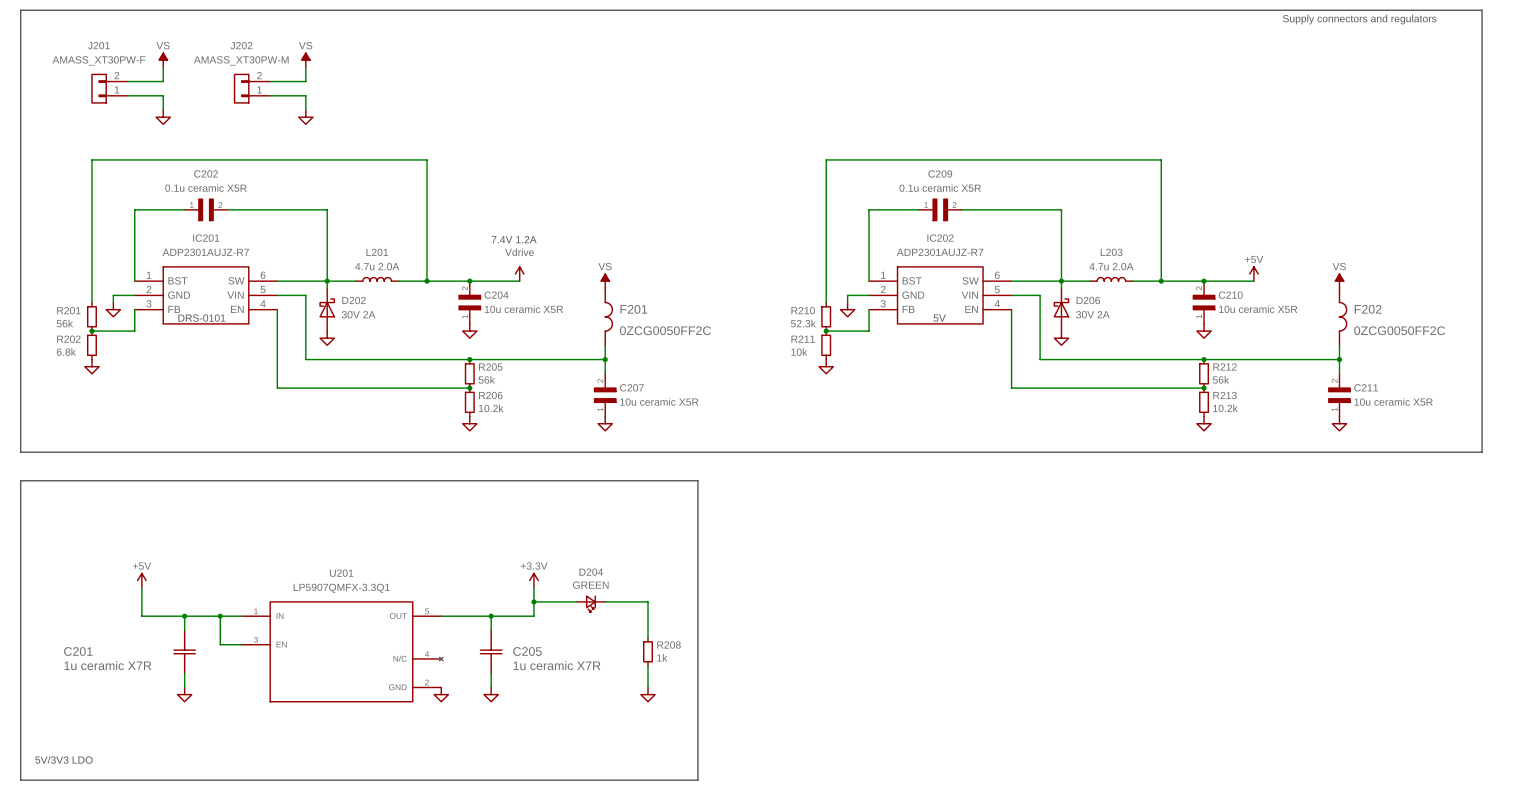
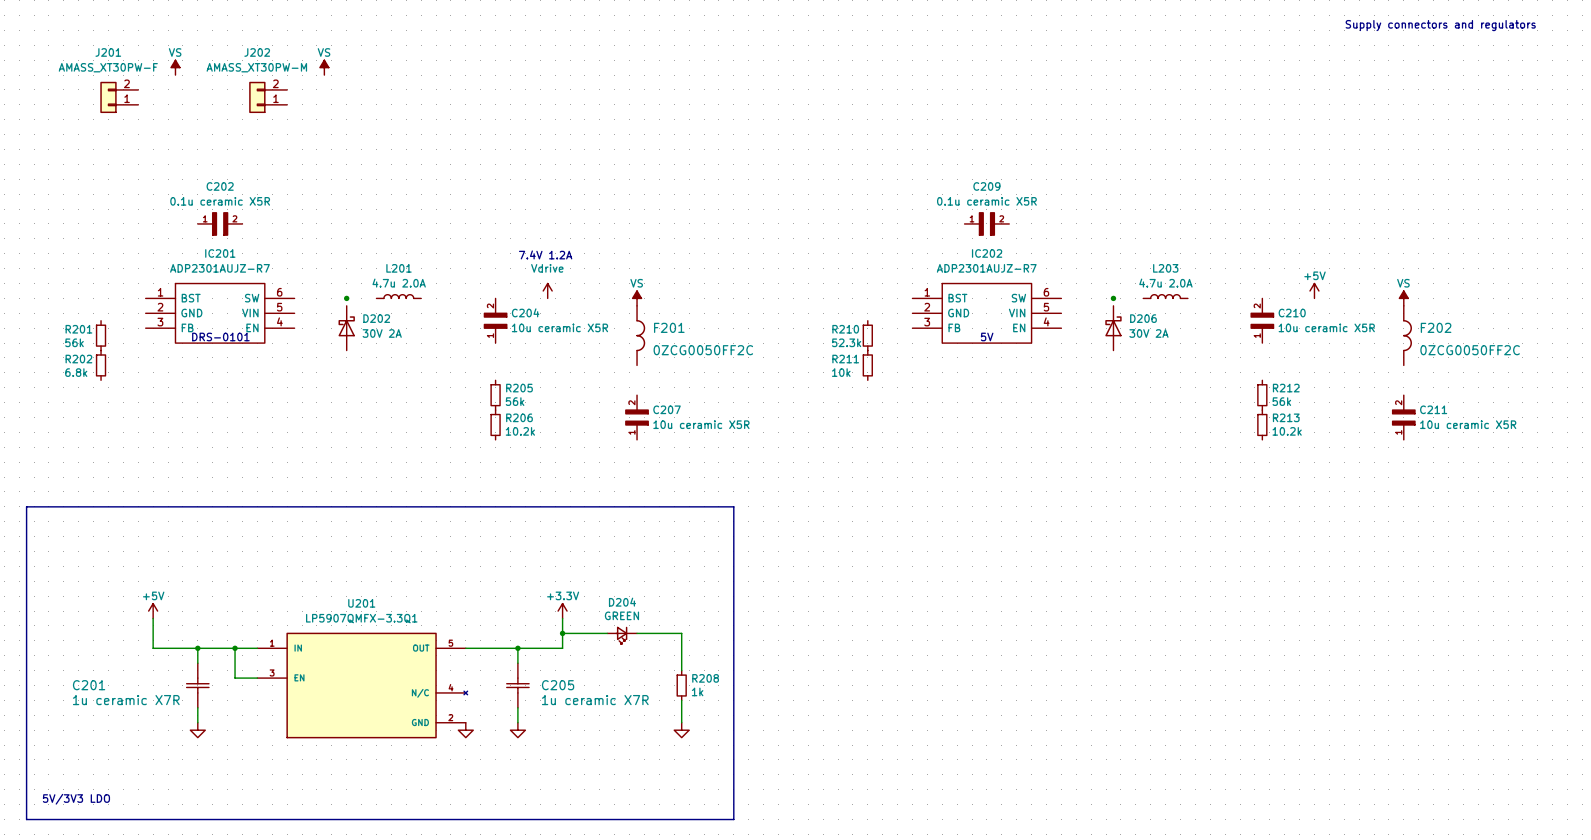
line: (20, 10) (1482, 10) (1482, 452) (20, 452) (20, 10) -> none
wire: (163, 67) (163, 81) (127, 81) -> none
wire: (305, 67) (305, 81) (270, 81) -> none
wire: (127, 95) (163, 95) (163, 110) -> none
wire: (270, 95) (305, 95) (305, 110) -> none
power symbol: (163, 117) -> none
power symbol: (305, 117) -> none
wire: (184, 209) (134, 209) (134, 281) -> none
wire: (227, 209) (327, 209) (327, 288) -> none
wire: (918, 209) (868, 209) (868, 281) -> none
wire: (961, 209) (1061, 209) (1061, 288) -> none
wire: (277, 281) (355, 281) -> none
wire: (398, 281) (519, 281) -> none
wire: (427, 281) (427, 159) (91, 159) (91, 302) -> none
junction: (427, 281) -> none
junction: (469, 281) -> none
wire: (1011, 281) (1089, 281) -> none
wire: (1132, 281) (1253, 281) -> none
wire: (1161, 281) (1161, 159) (826, 159) (826, 302) -> none
junction: (1161, 281) -> none
junction: (1204, 281) -> none
wire: (134, 295) (113, 295) (113, 302) -> none
wire: (277, 295) (305, 295) (305, 359) (605, 359) -> none
wire: (868, 295) (847, 295) (847, 302) -> none
wire: (1011, 295) (1040, 295) (1040, 359) (1339, 359) -> none
power symbol: (113, 309) -> none
wire: (134, 309) (134, 331) (91, 331) -> none
wire: (277, 309) (277, 388) (469, 388) -> none
power symbol: (847, 309) -> none
wire: (868, 309) (868, 331) (826, 331) -> none
wire: (1011, 309) (1011, 388) (1204, 388) -> none
junction: (91, 331) -> none
power symbol: (469, 331) -> none
junction: (826, 331) -> none
power symbol: (1204, 331) -> none
power symbol: (327, 338) -> none
power symbol: (1061, 338) -> none
wire: (605, 345) (605, 373) -> none
wire: (1339, 345) (1339, 373) -> none
junction: (469, 359) -> none
junction: (605, 359) -> none
junction: (1204, 359) -> none
junction: (1339, 359) -> none
power symbol: (91, 366) -> none
power symbol: (826, 366) -> none
junction: (469, 388) -> none
junction: (1204, 388) -> none
power symbol: (469, 423) -> none
power symbol: (605, 423) -> none
power symbol: (1204, 423) -> none
power symbol: (1339, 423) -> none

